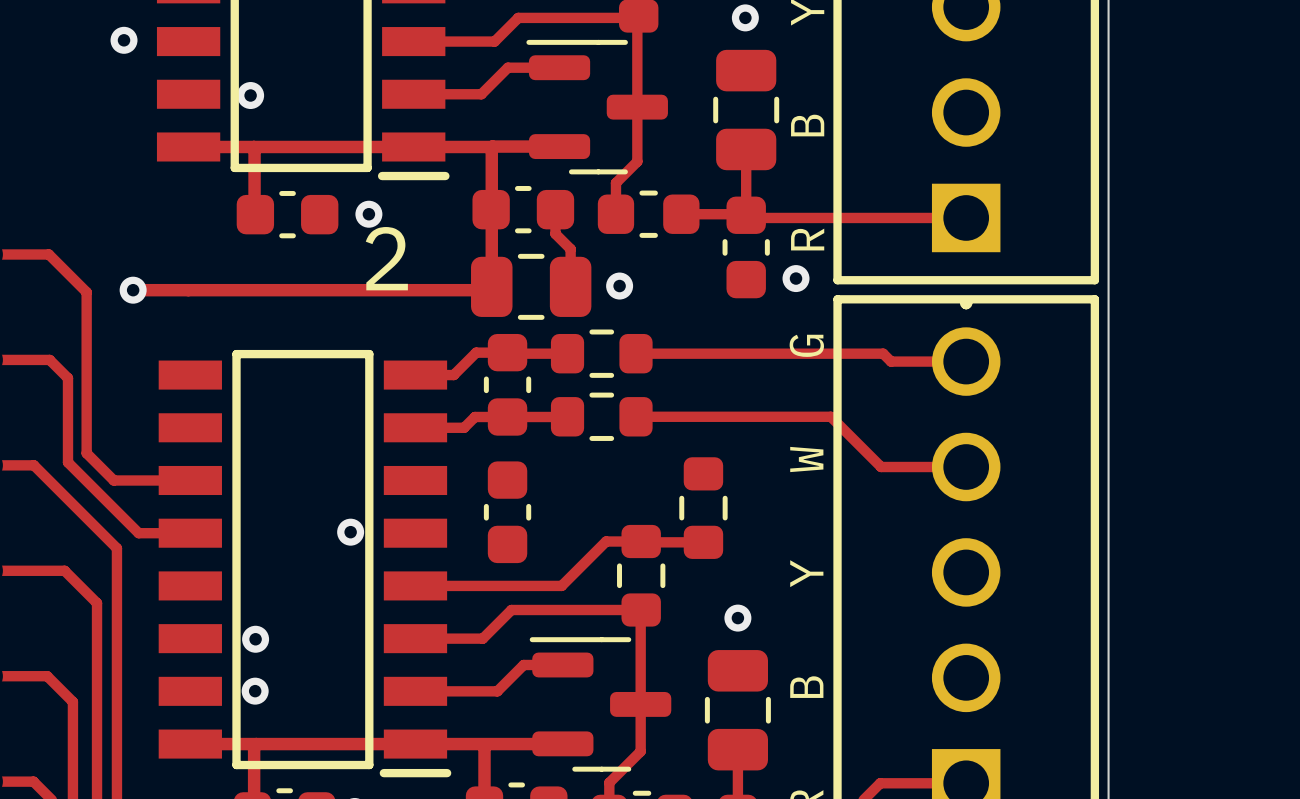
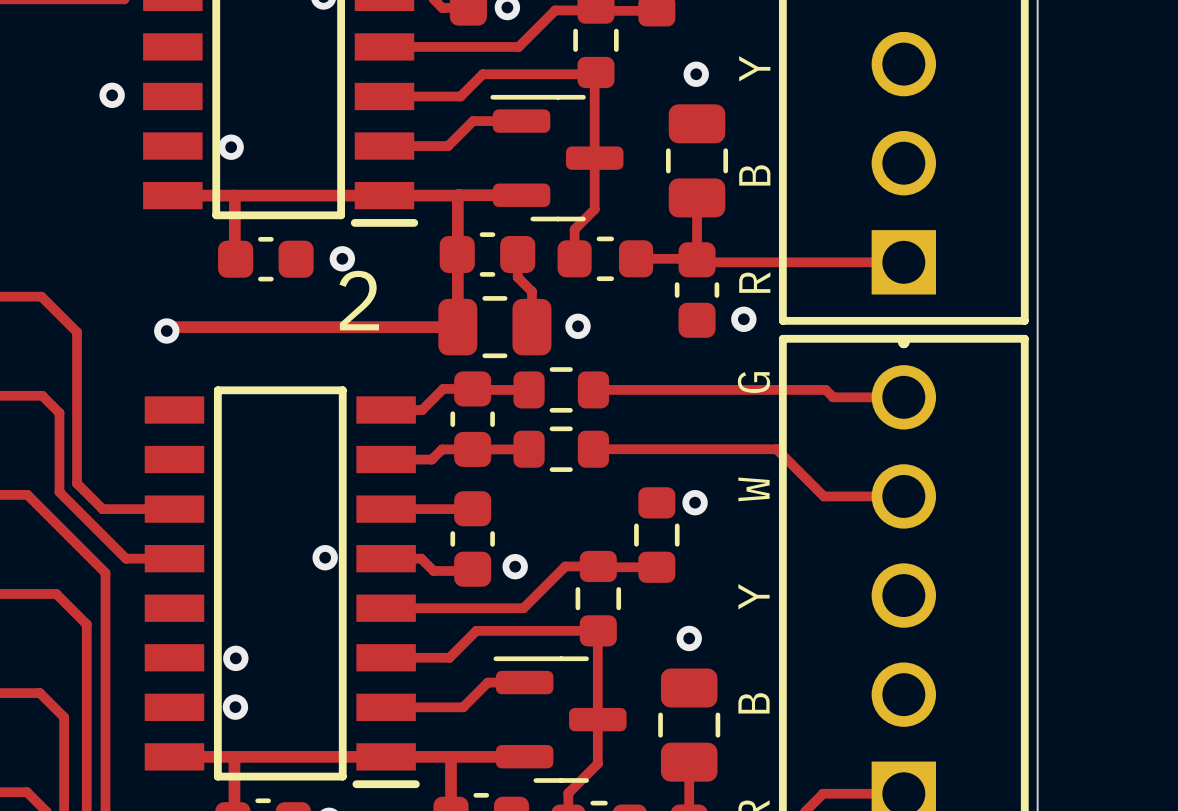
track: (491, 286) (488, 290) (133, 290) -> (457, 327) (170, 327) (166, 330)
via position: (133, 290) -> (166, 330)
via: none -> (695, 502)
track: none -> (386, 509) (472, 509)
track: none -> (386, 558) (421, 558) (433, 570) (470, 570) (472, 569)
via: none -> (515, 566)

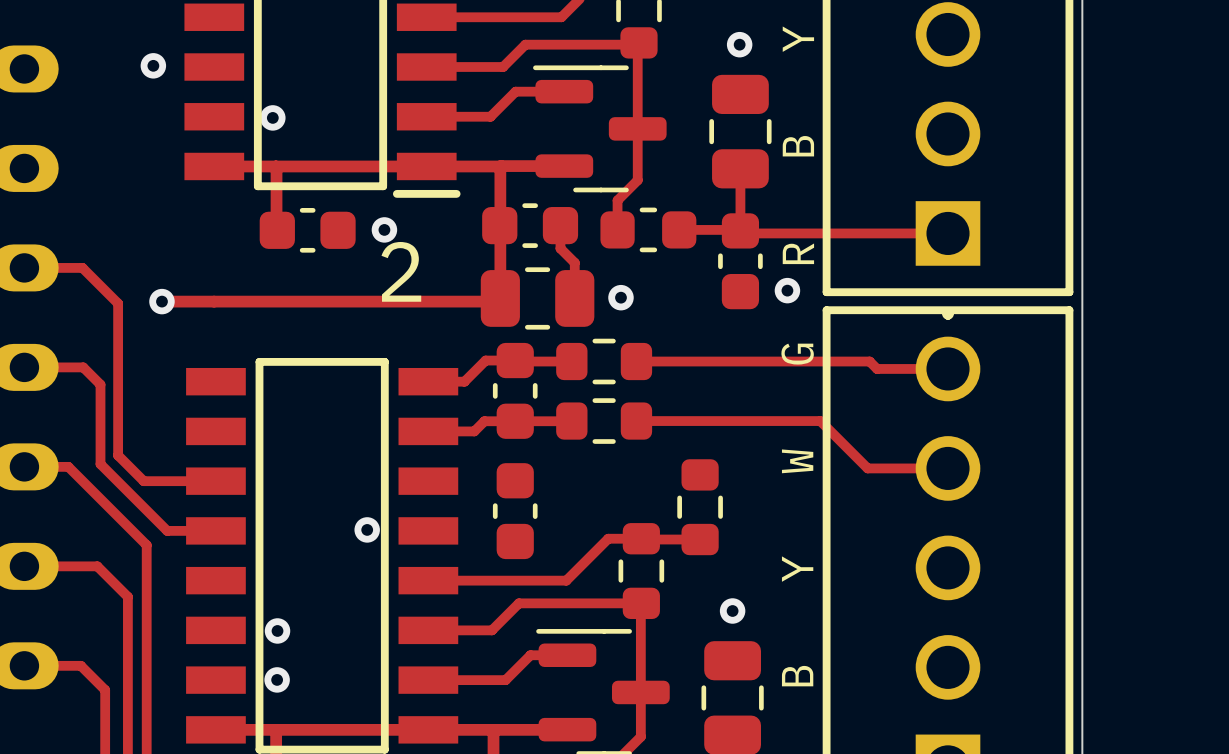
track: (457, 327) (170, 327) (166, 330) -> (500, 298) (497, 301) (161, 301)
via position: (166, 330) -> (161, 301)
via: (695, 502) -> none
track: (386, 509) (472, 509) -> none
track: (386, 558) (421, 558) (433, 570) (470, 570) (472, 569) -> none
via: (515, 566) -> none

